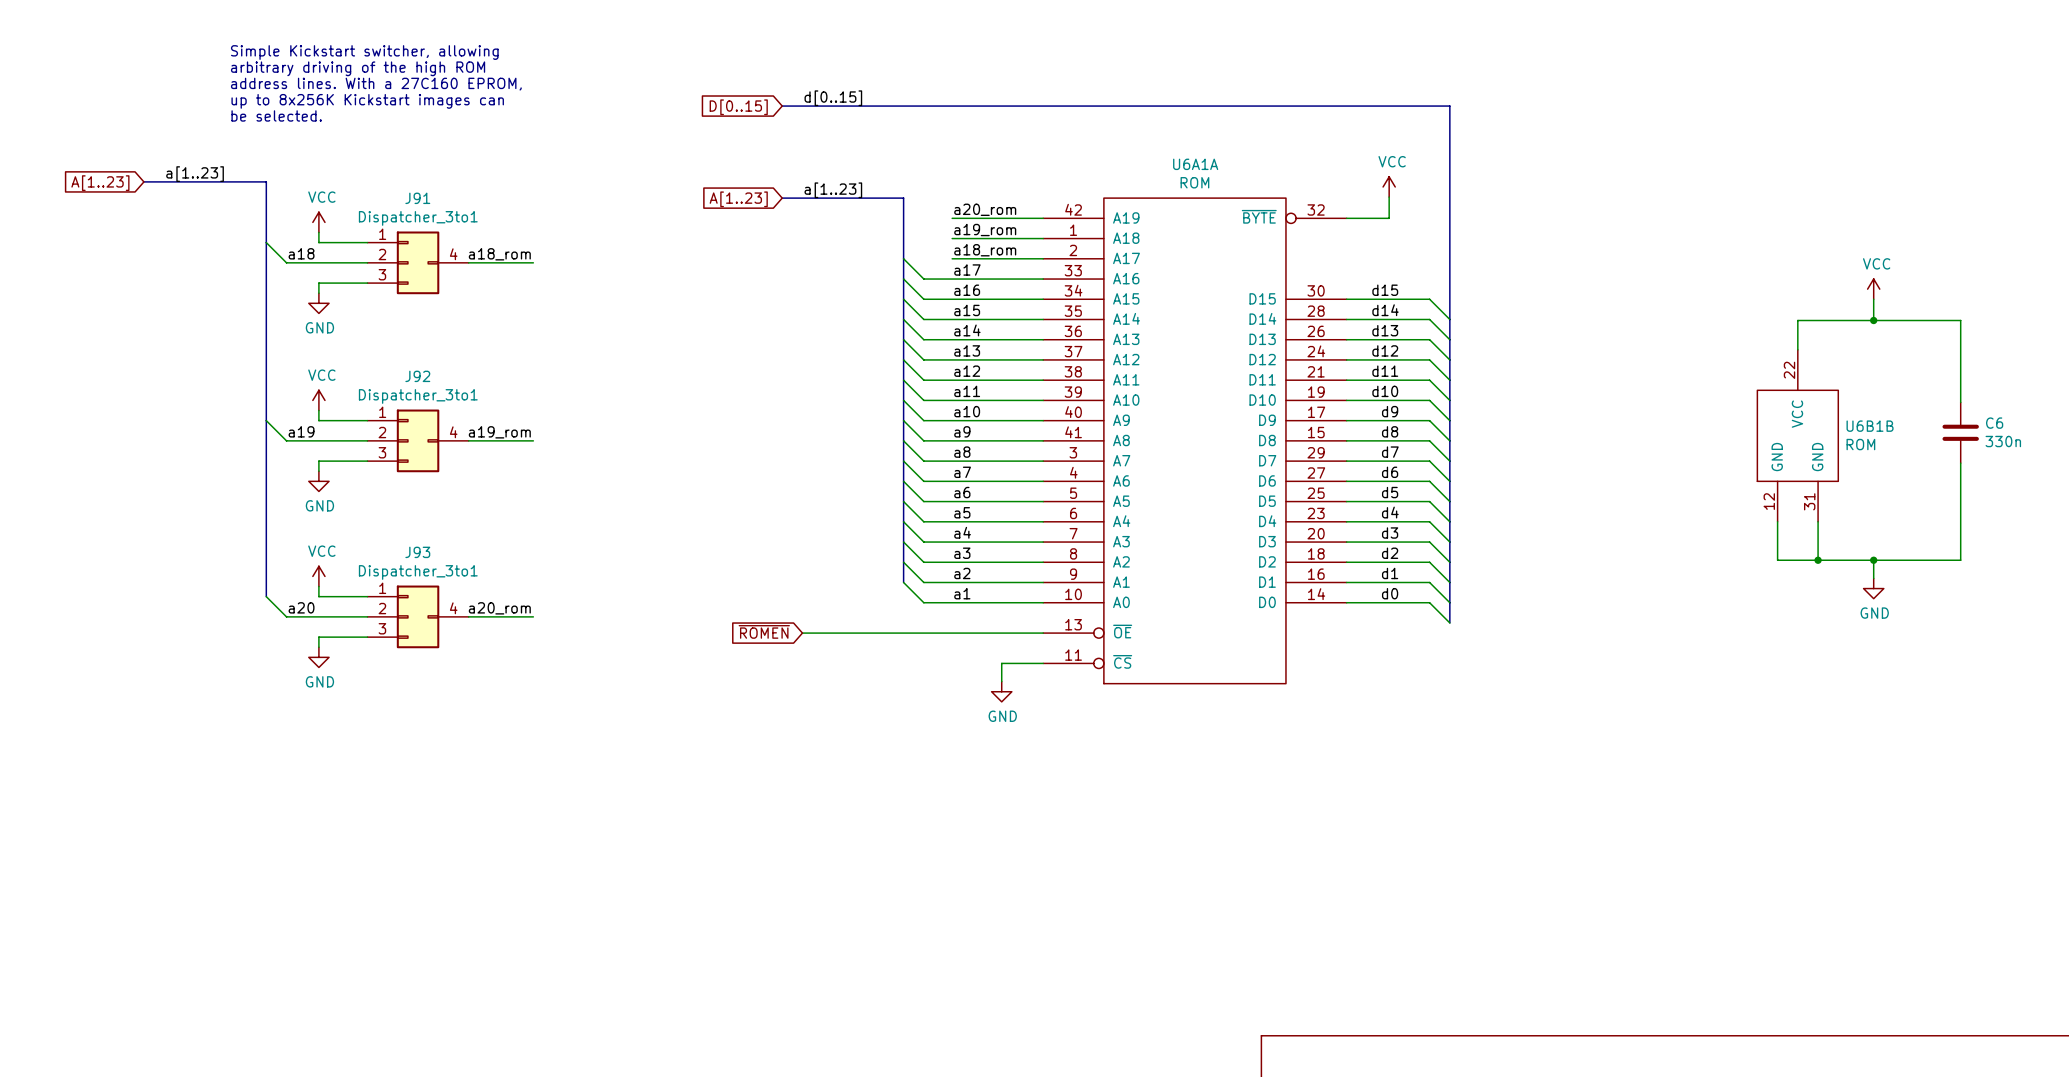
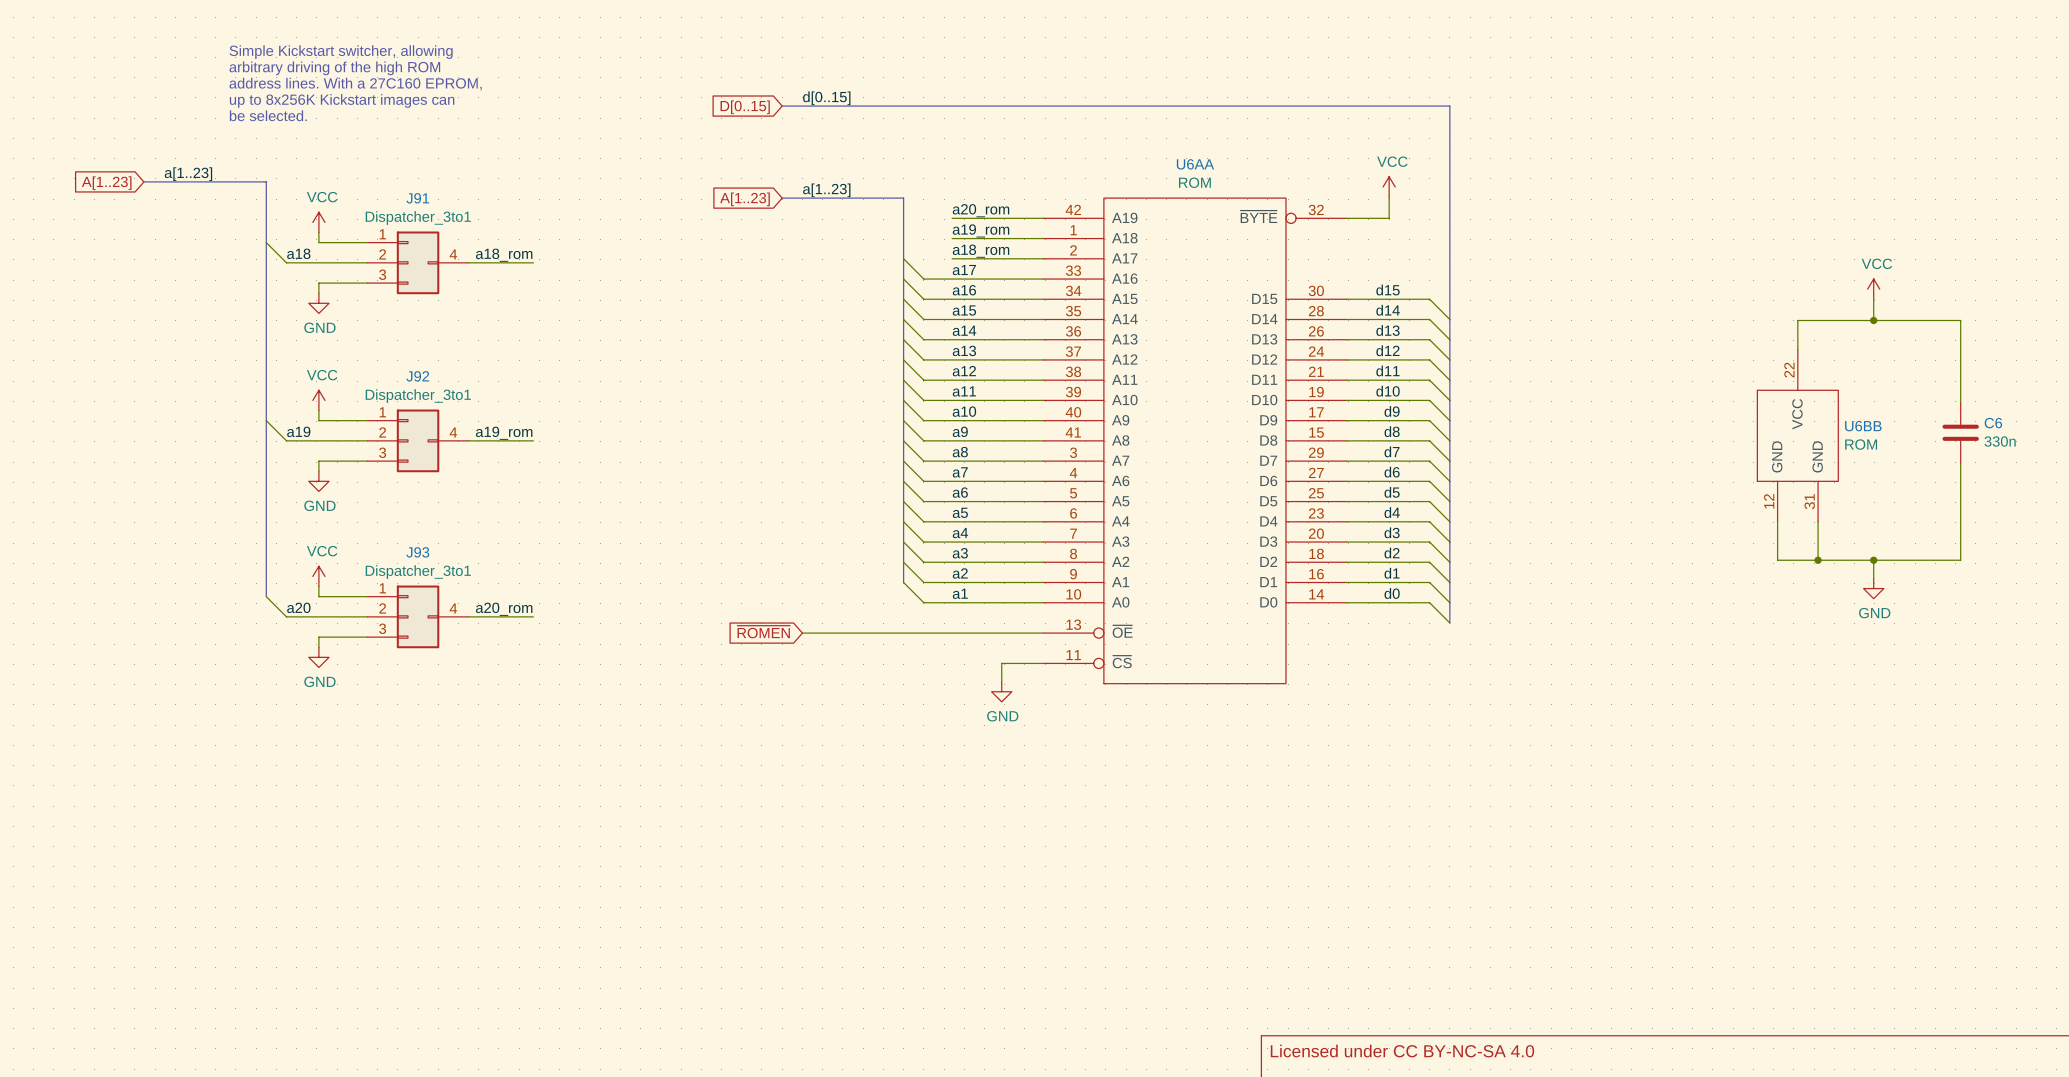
U6A1A name: U6A1A (1195, 164) -> U6AA (1195, 164)
U6B1B name: U6B1B (1870, 426) -> U6BB (1863, 426)
title block: none -> Licensed under CC BY-NC-SA 4.0 (1402, 1051)

